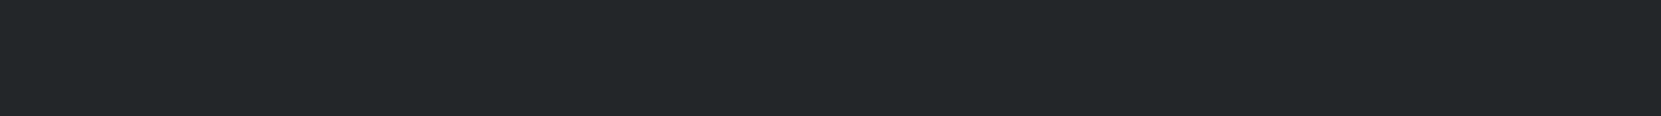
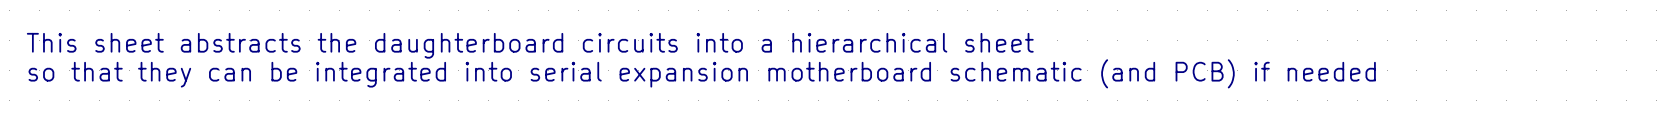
text: none -> This sheet abstracts the daughterboard circuits into a hierarchical sheet (530, 45)
text: none -> so that they can be integrated into serial expansion motherboard schematic (and PCB) if needed (702, 73)

